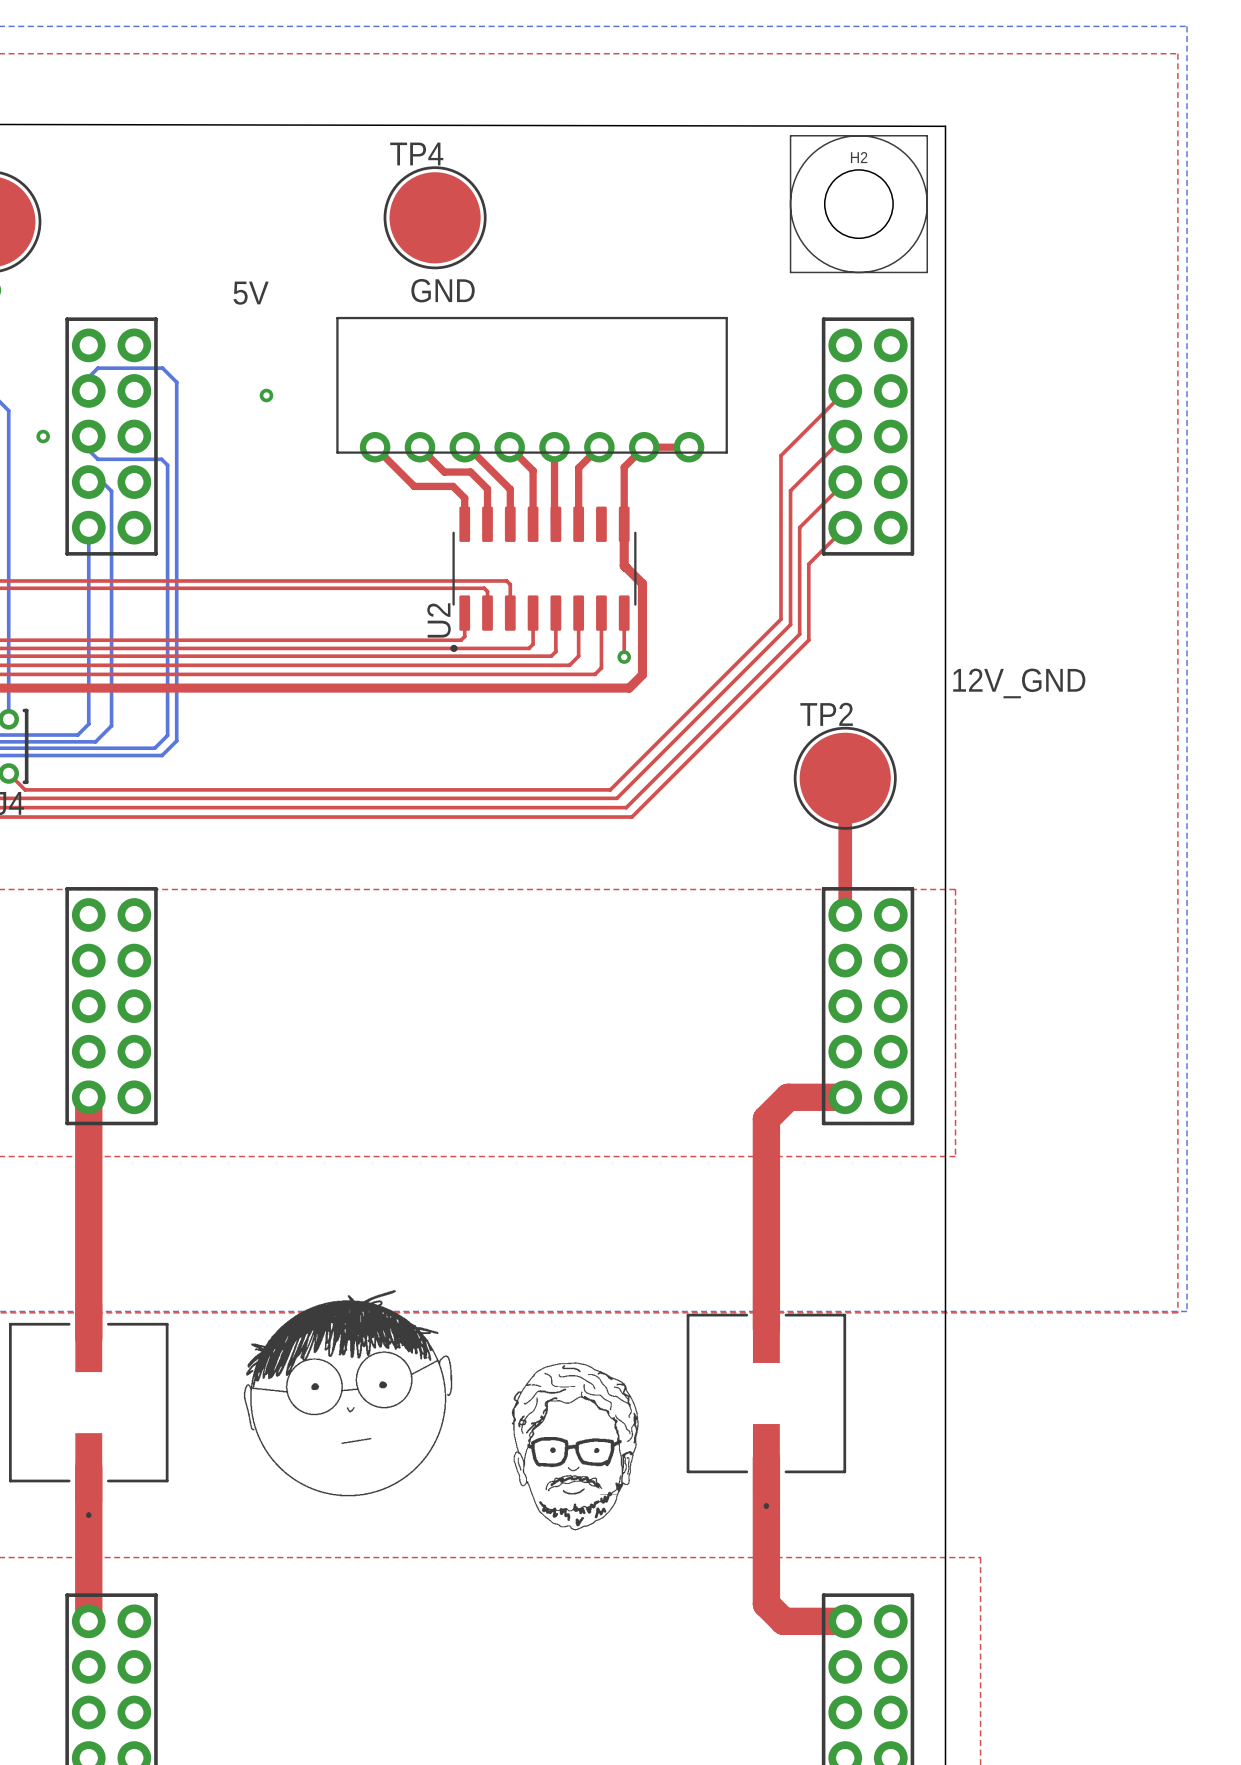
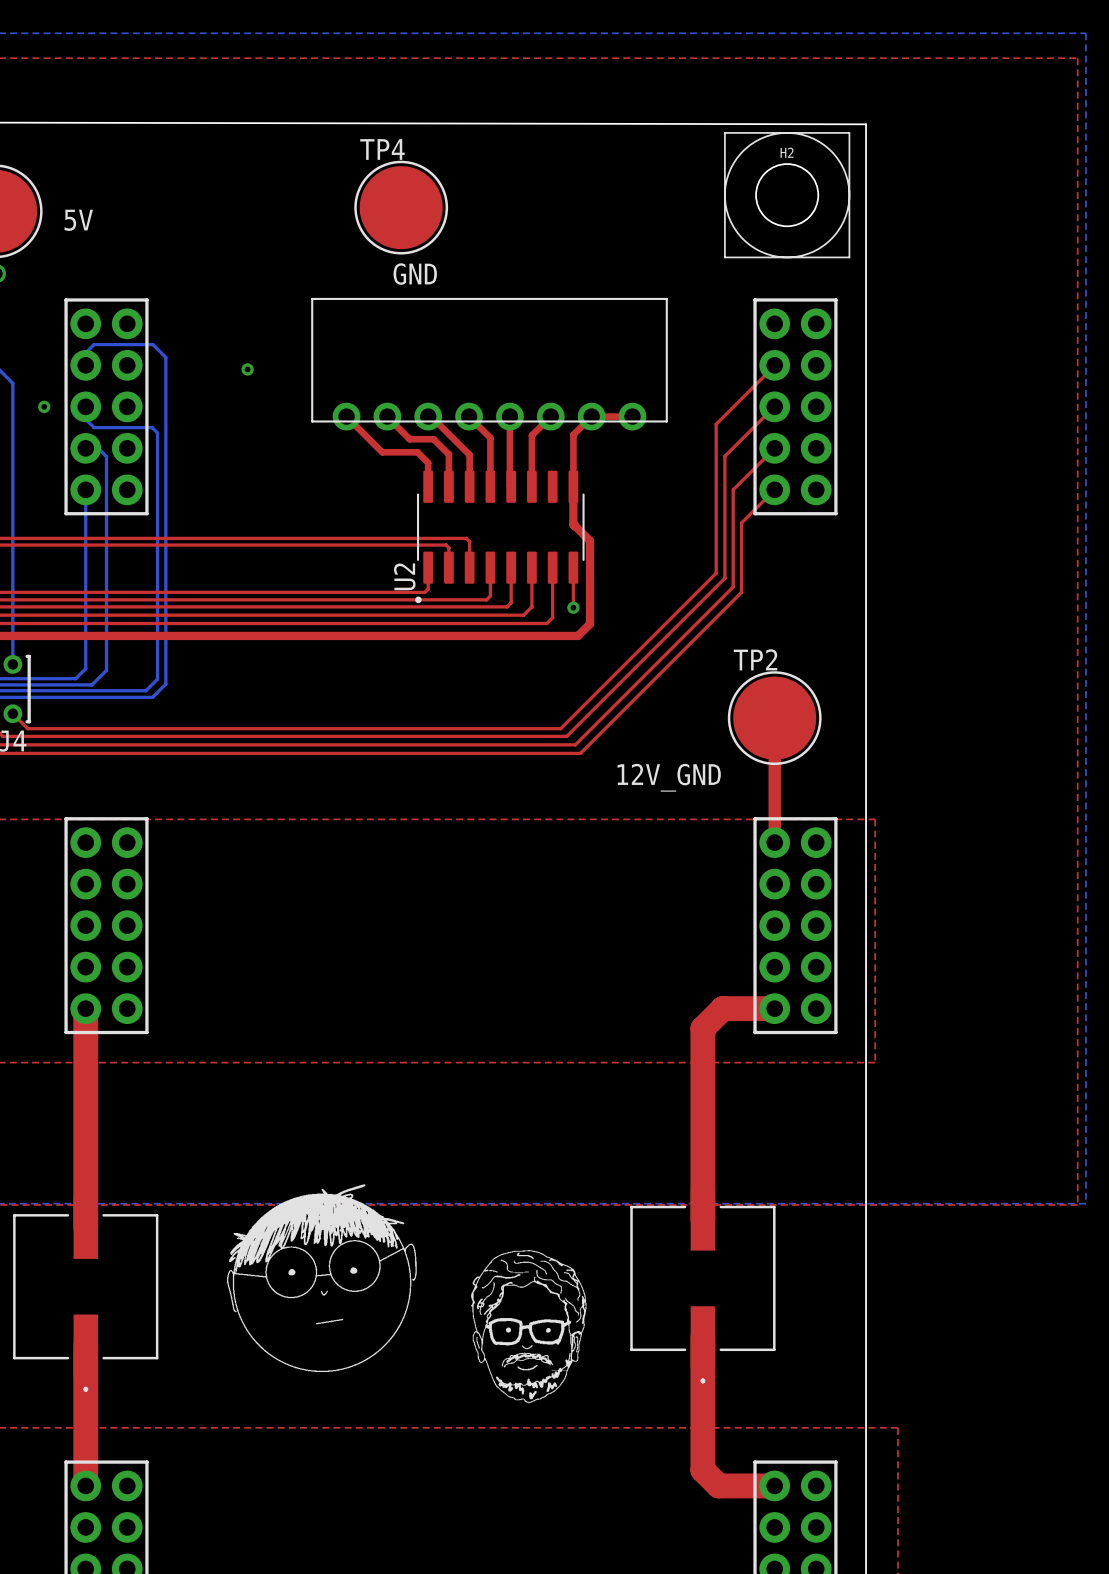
text position: 5V (251, 293) -> 5V (78, 220)
text position: 12V_GND (1019, 683) -> 12V_GND (669, 777)

